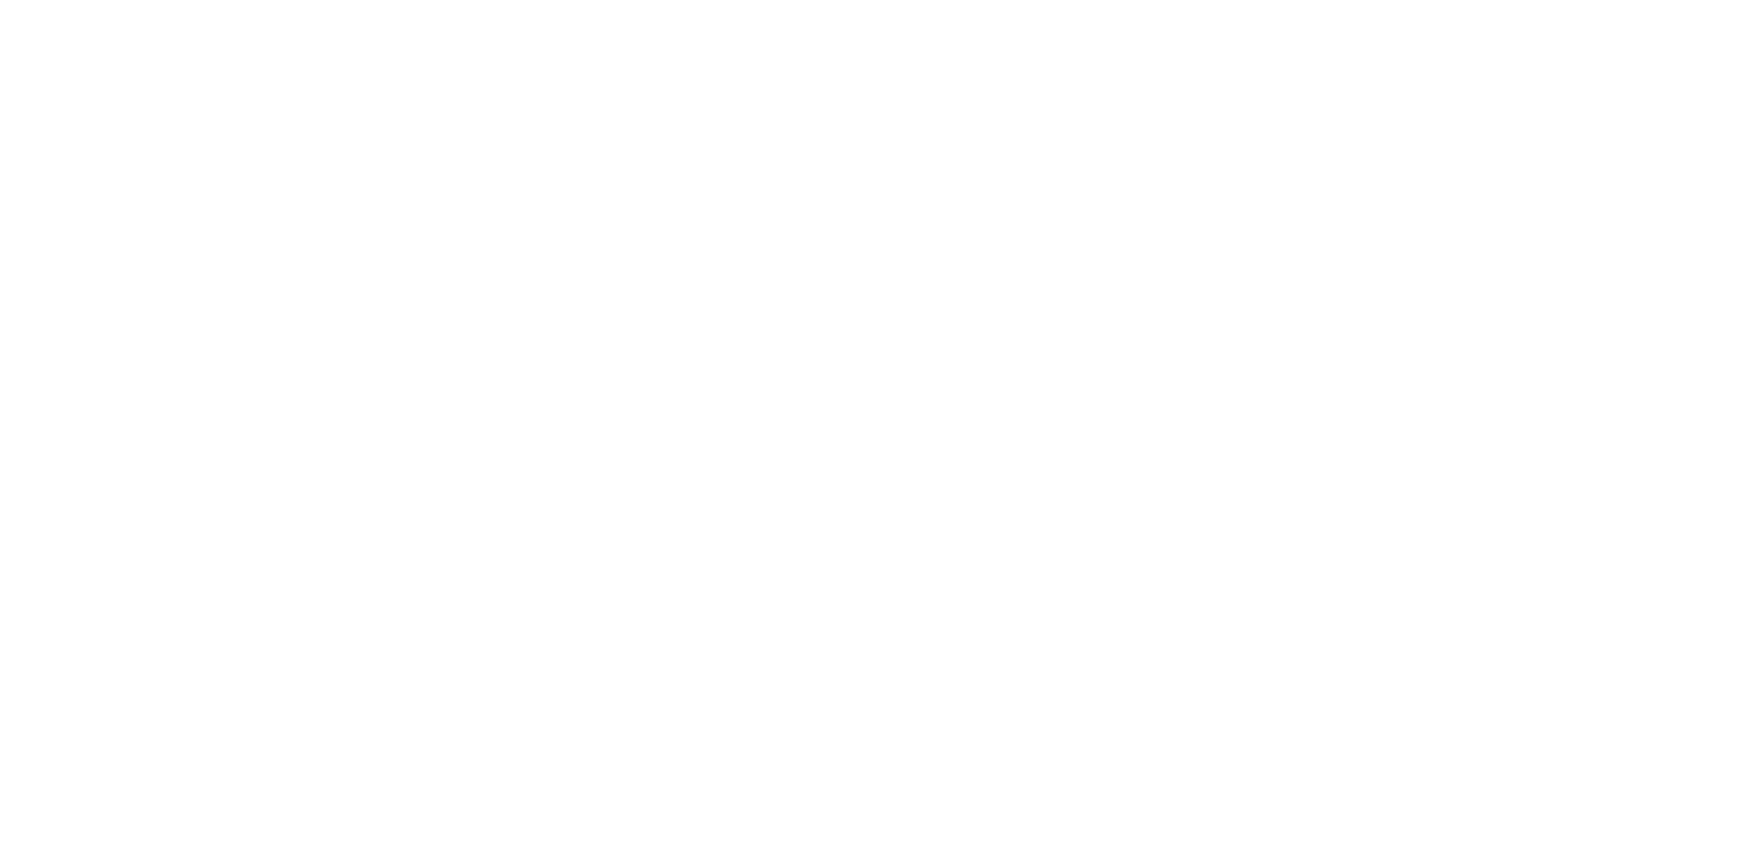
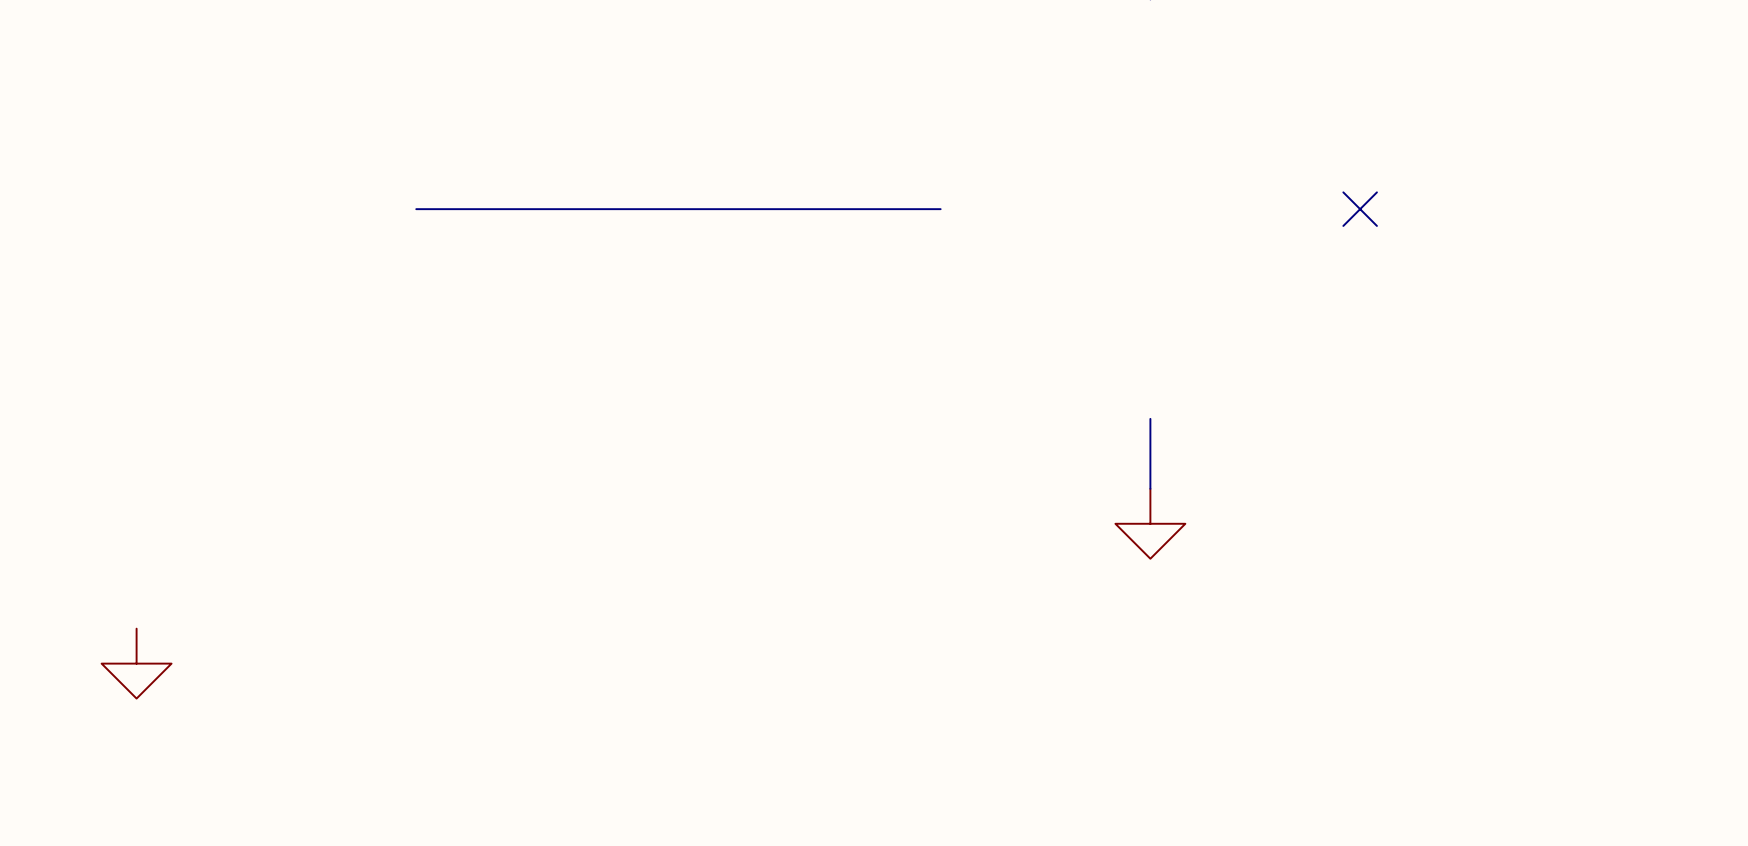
wire: none -> (416, 209) (940, 209)
no-connect mark: none -> (1360, 209)
wire: none -> (1150, 418) (1150, 488)
power symbol: none -> (1150, 523)
power symbol: none -> (136, 663)

